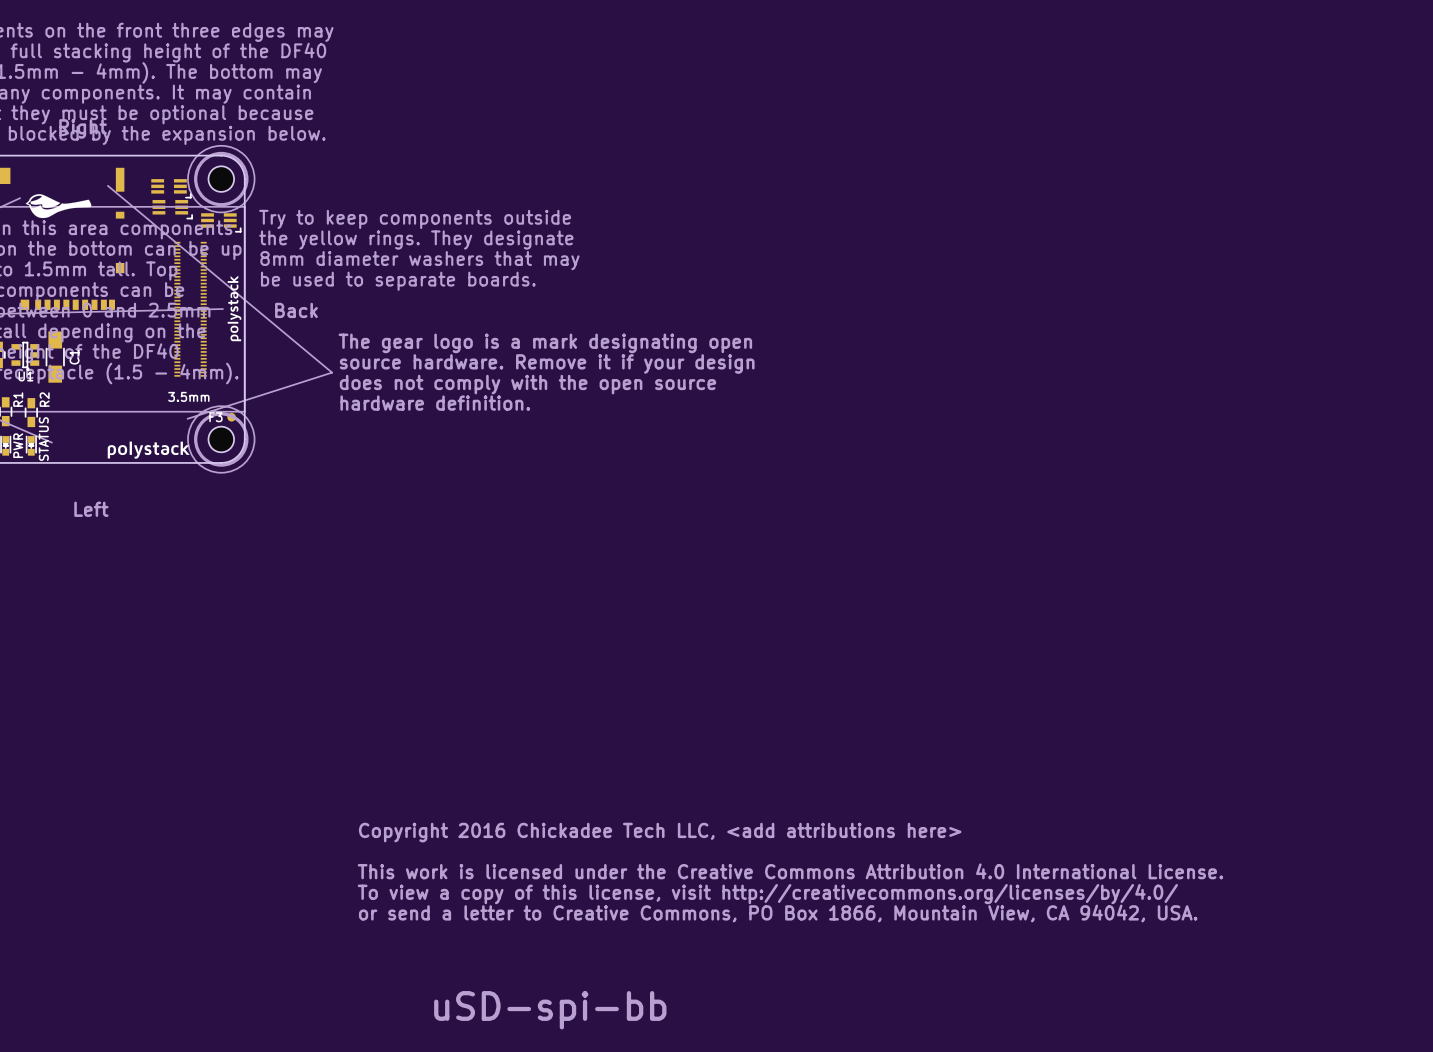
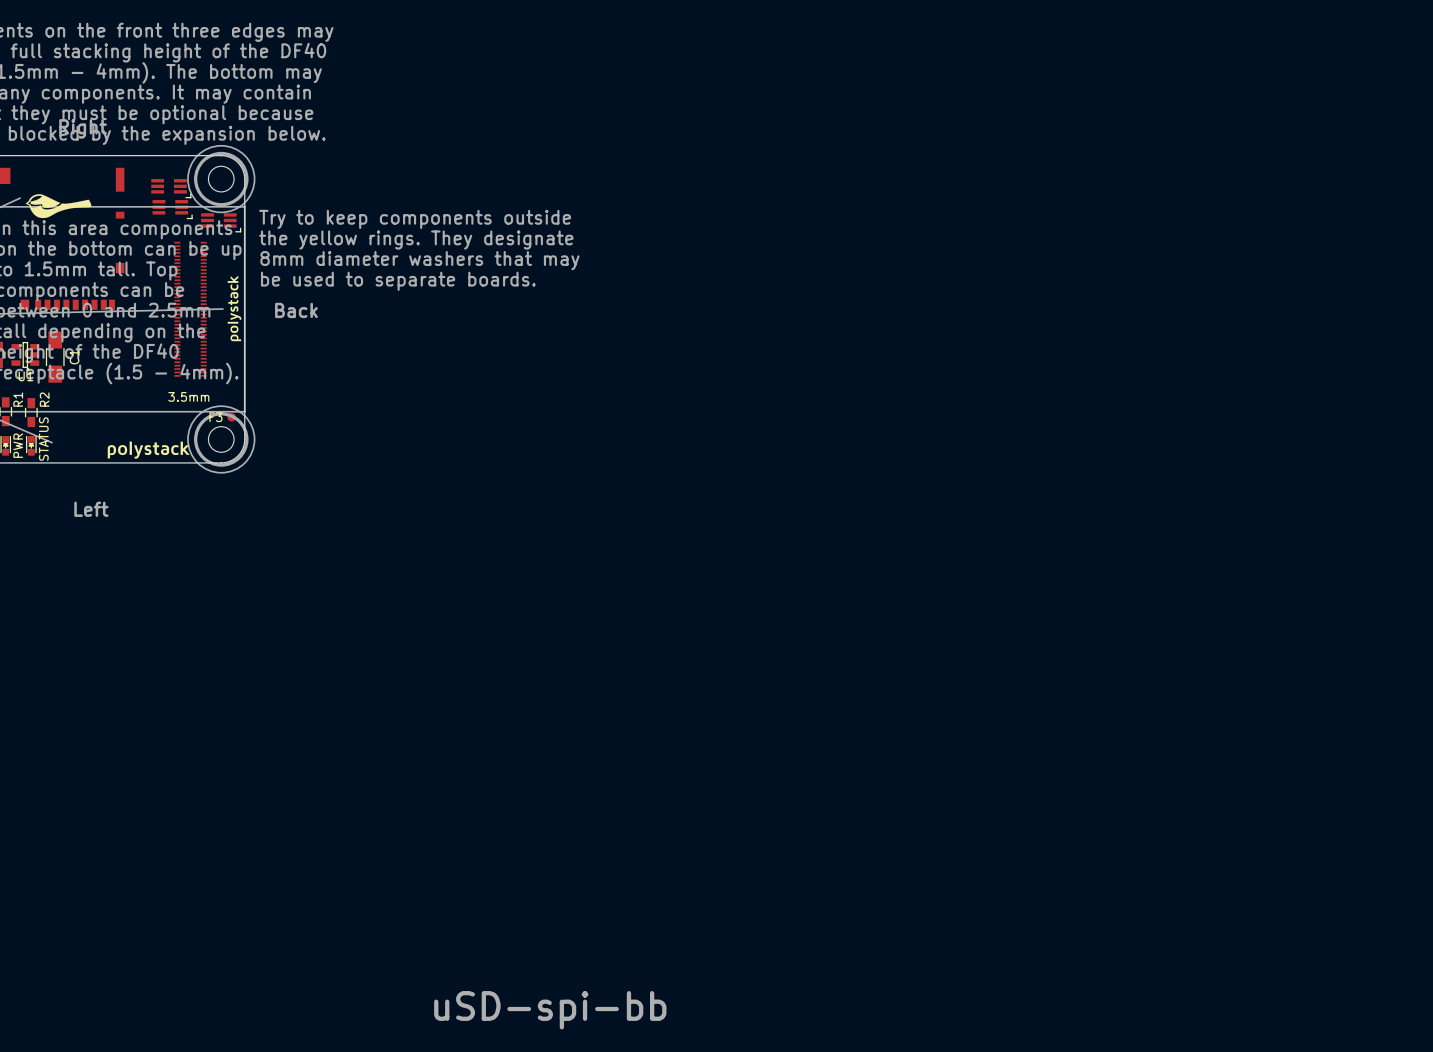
line: (107, 185) (332, 372) (187, 418) -> none
text: The gear logo is a mark designating open (545, 343) -> none
text: source hardware. Remove it if your design (547, 363) -> none
text: does not comply with the open source (527, 384) -> none
text: hardware definition. (435, 403) -> none
text: Copyright 2016 Chickadee Tech LLC, <add attributions here> (660, 832) -> none
text: This work is licensed under the Creative Commons Attribution 4.0 International License. (790, 871) -> none
text: To view a copy of this license, visit http://creativecommons.org/licenses/by/4.0/ (767, 894) -> none
text: or send a letter to Creative Commons, PO Box 1866, Mountain View, CA 94042, USA. (778, 913) -> none

